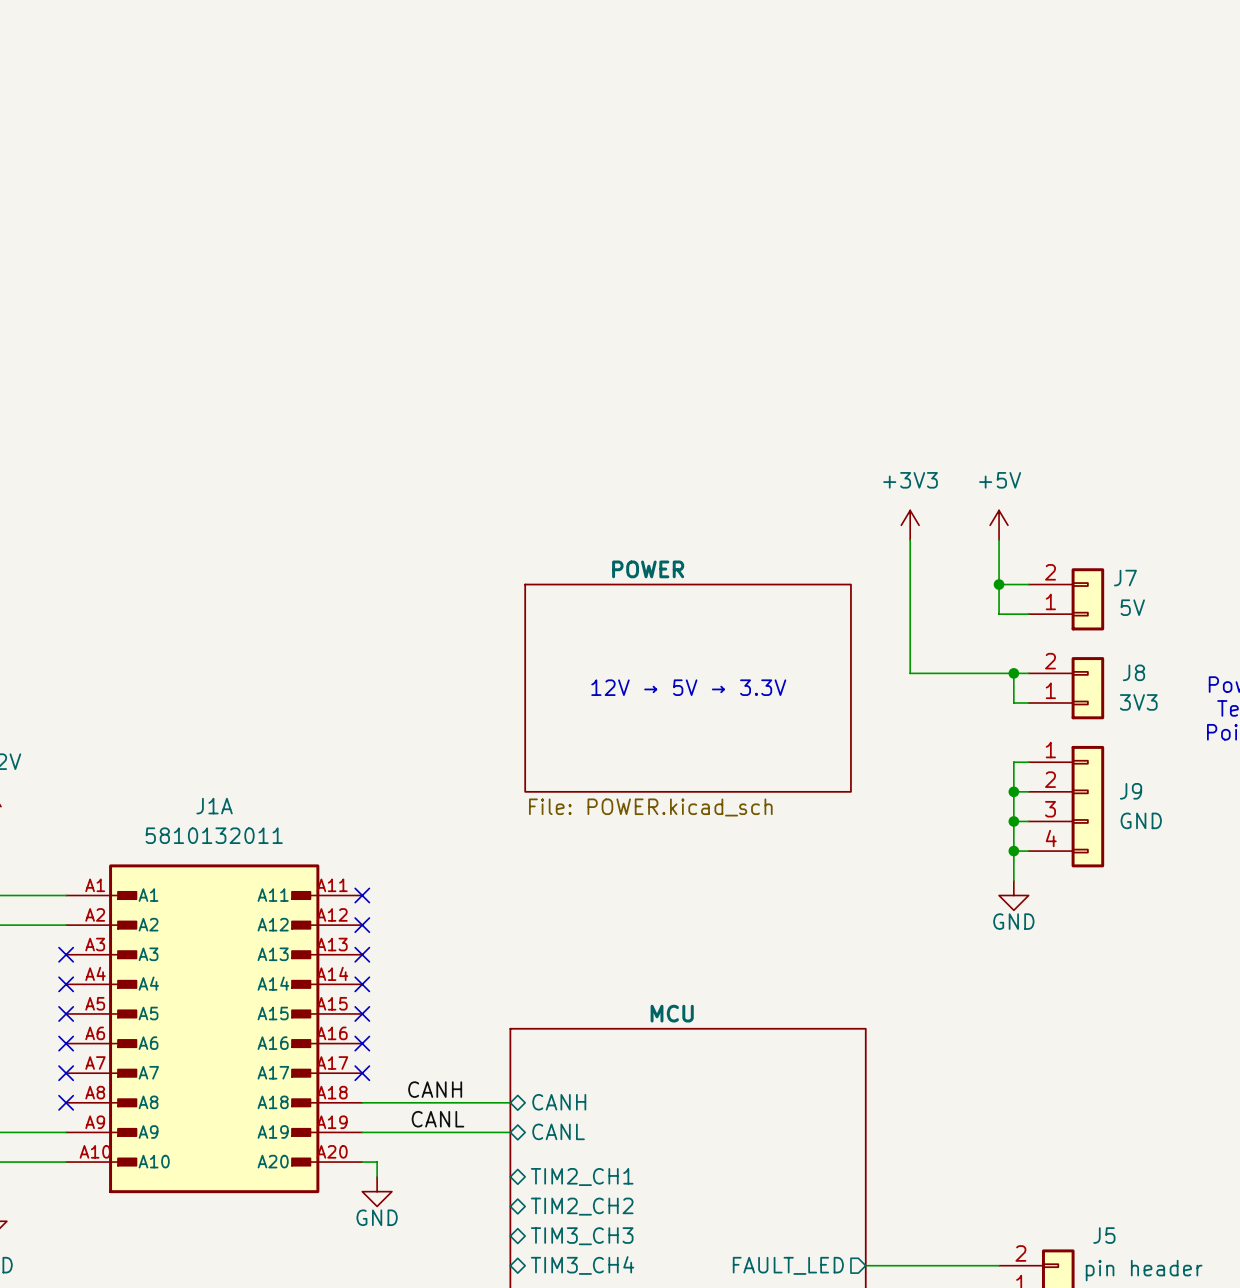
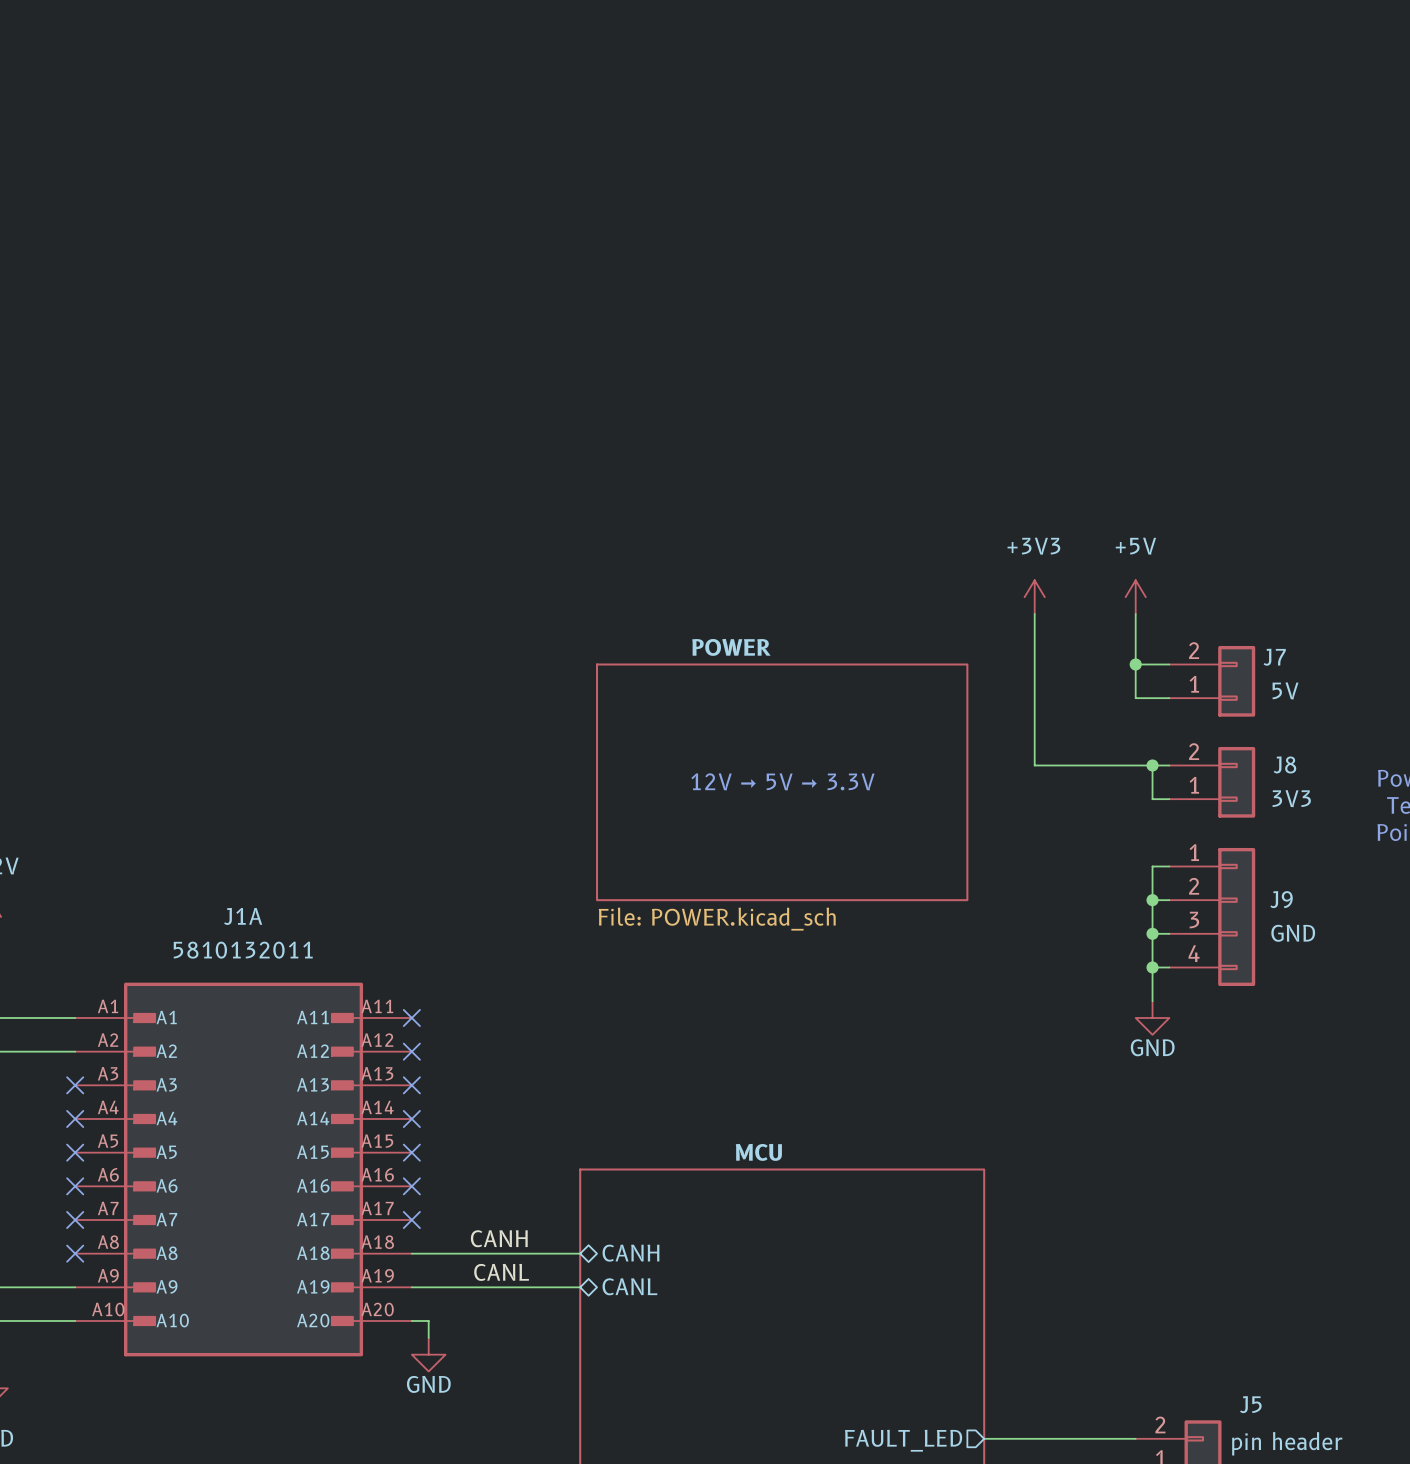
sheet pin: TIM2_CH1 (582, 1177) -> none
sheet pin: TIM2_CH2 (582, 1206) -> none
sheet pin: TIM3_CH3 (582, 1236) -> none
sheet pin: TIM3_CH4 (582, 1265) -> none

